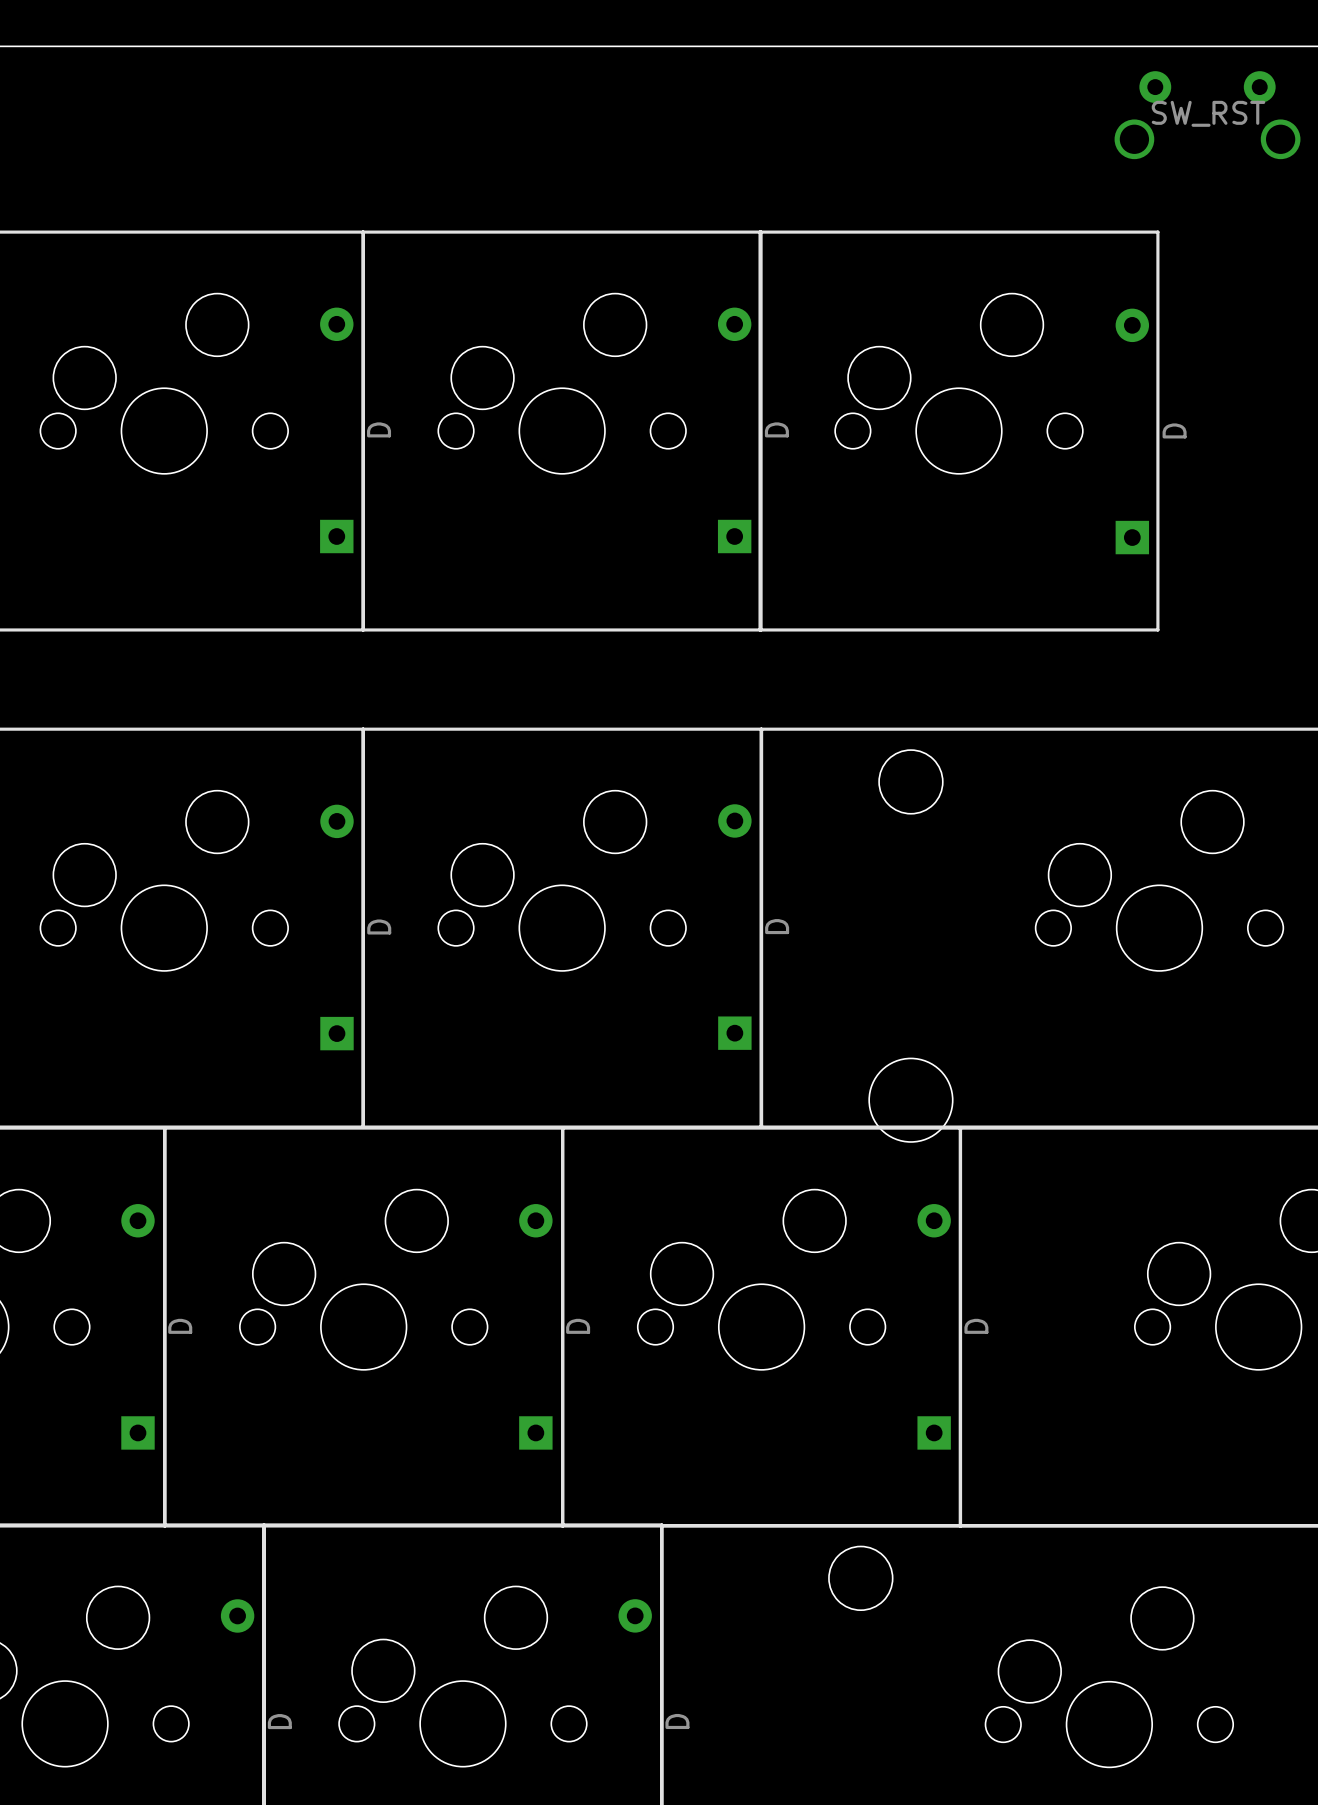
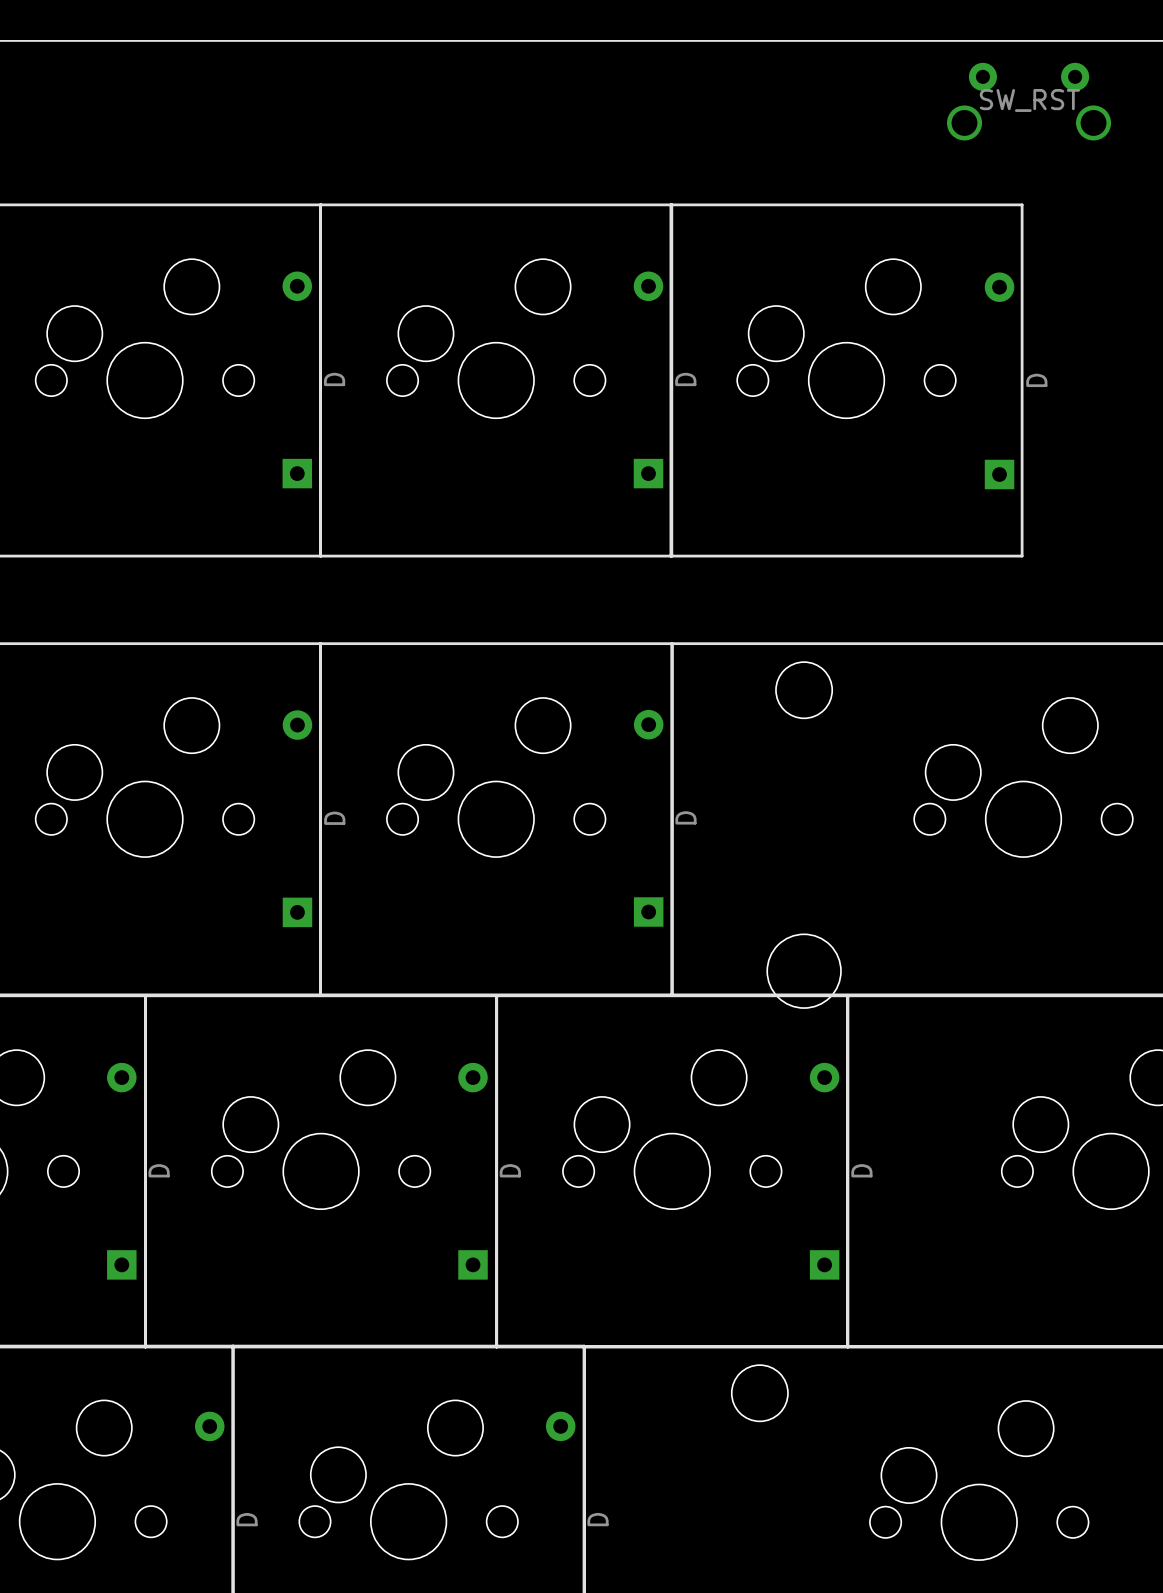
part position: (1207, 115) -> (1029, 101)

